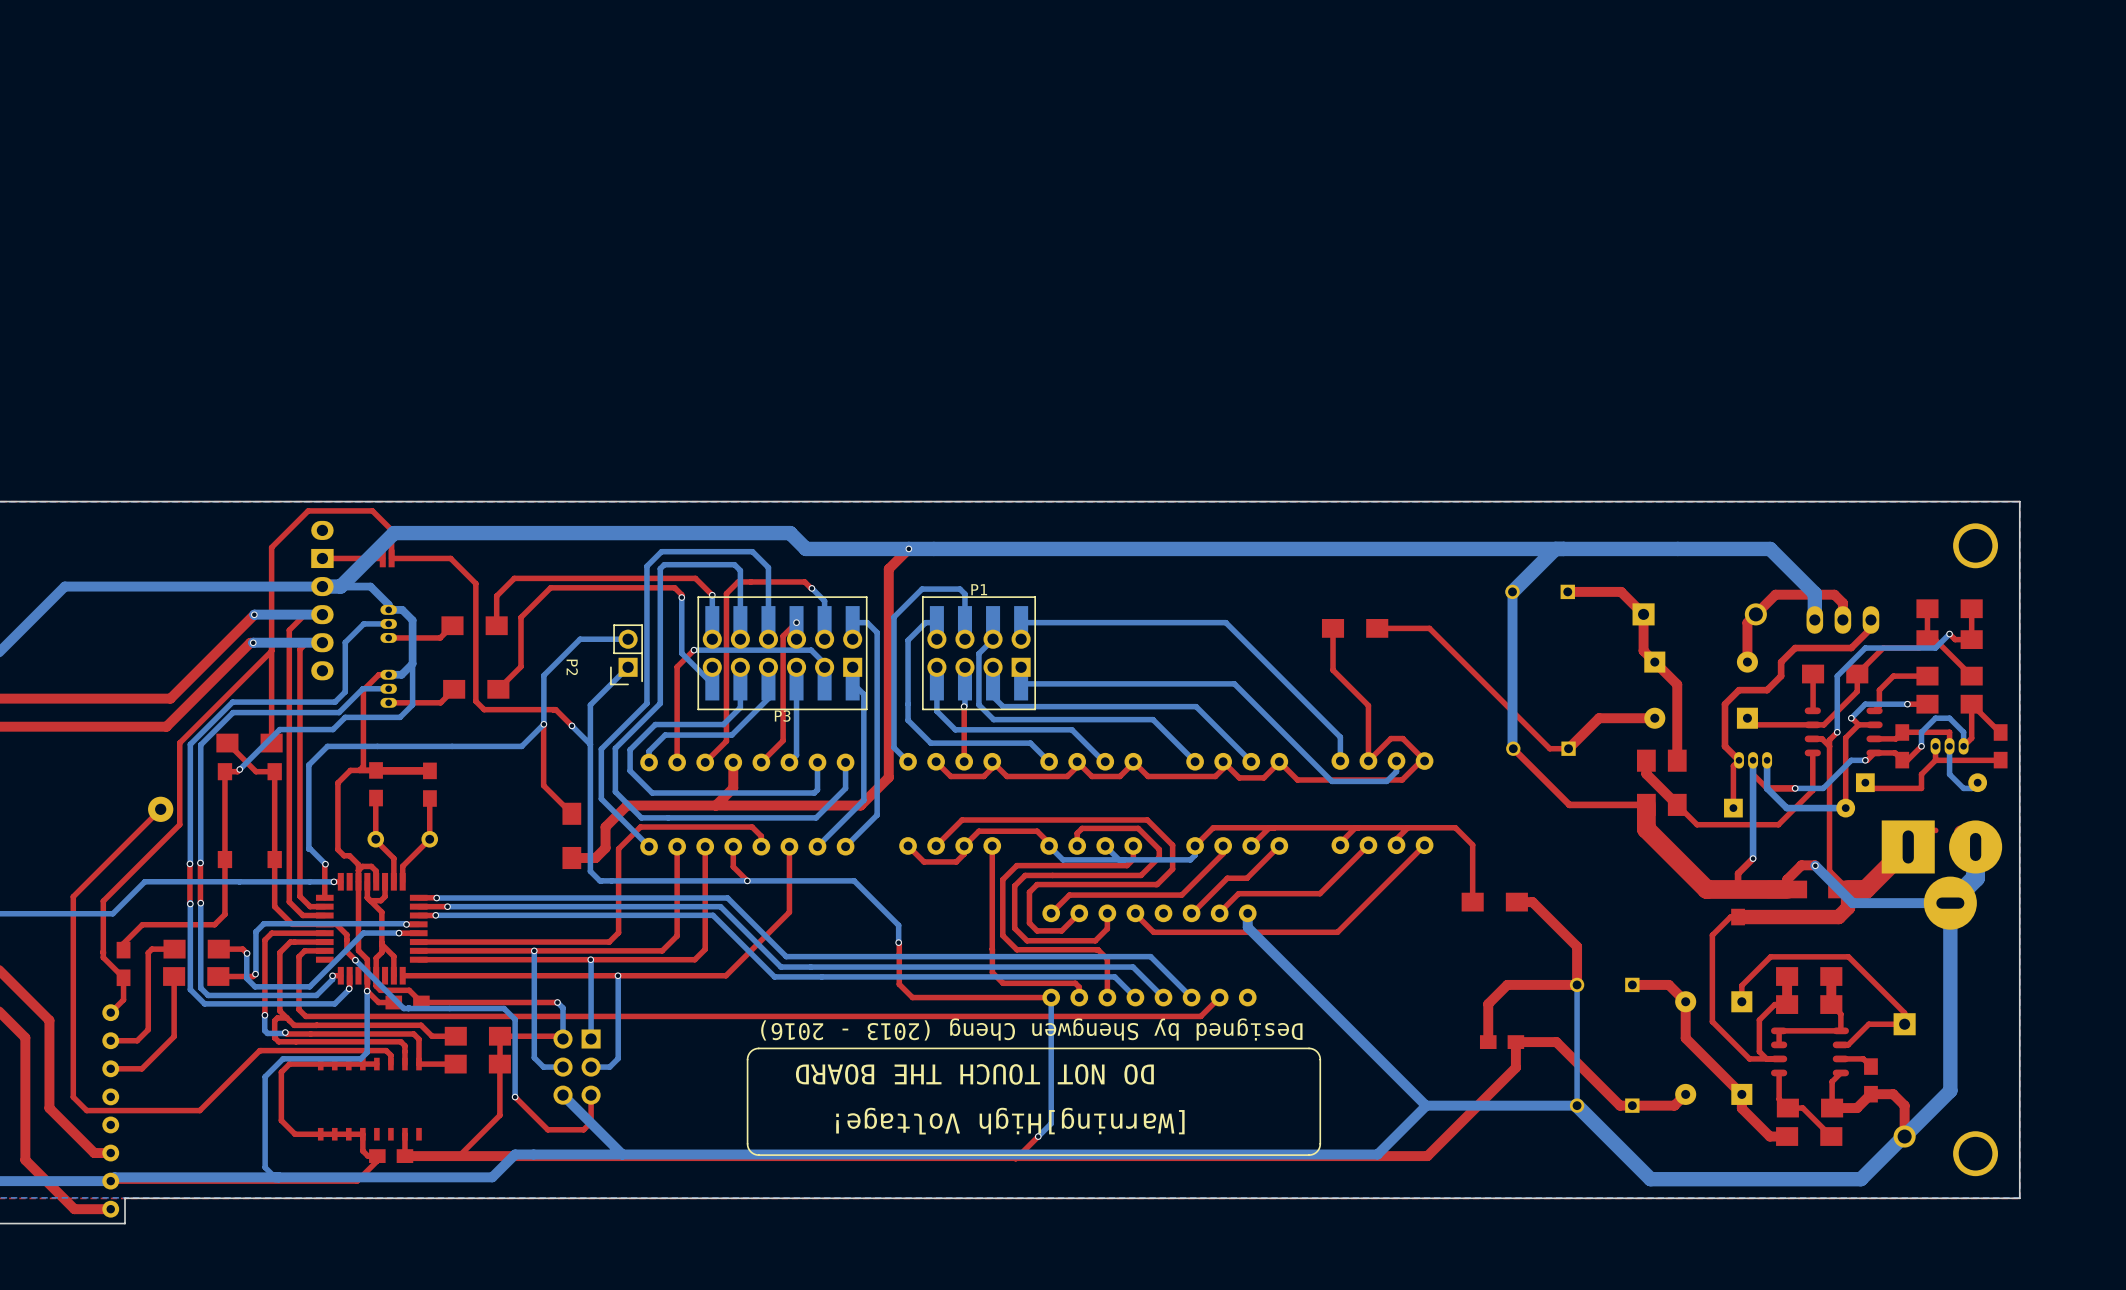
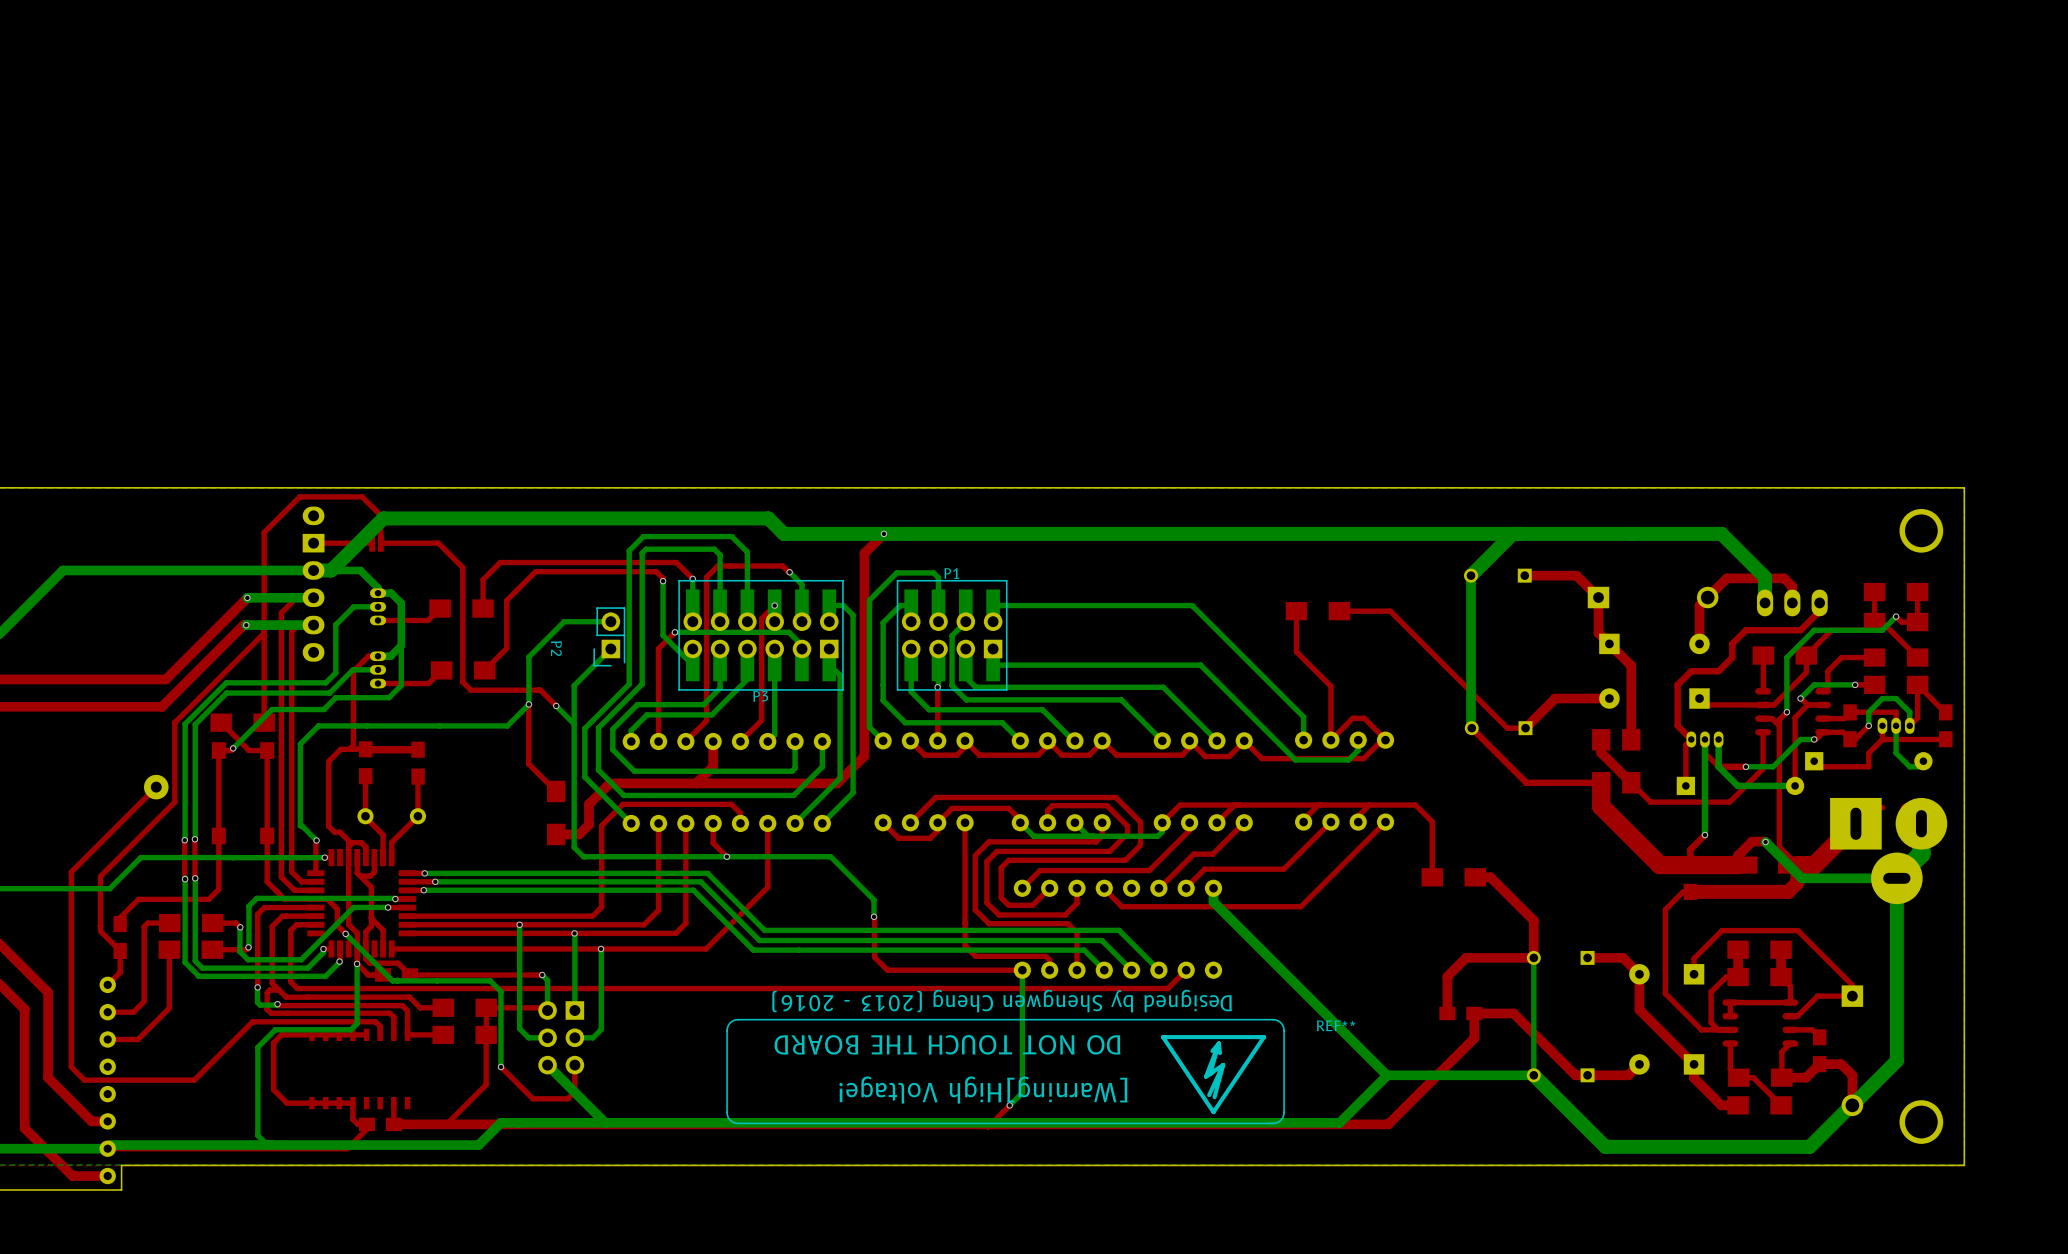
REF**: none -> (1213, 1074)

